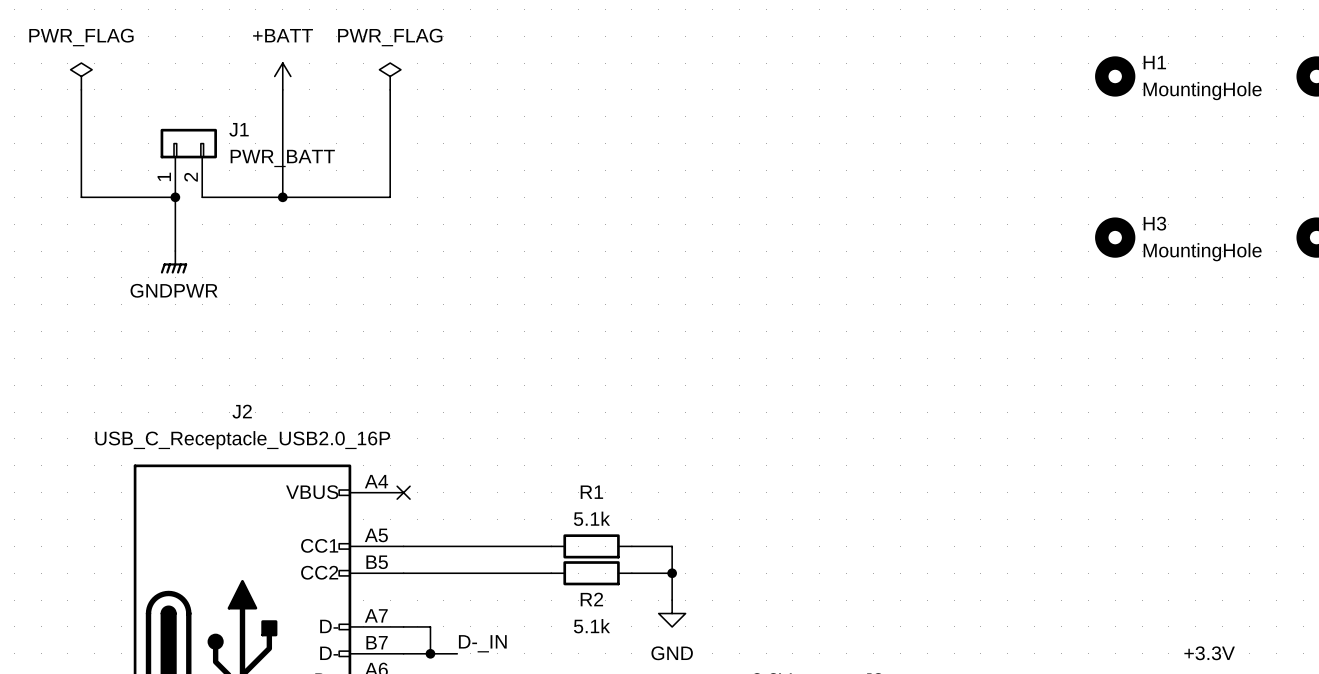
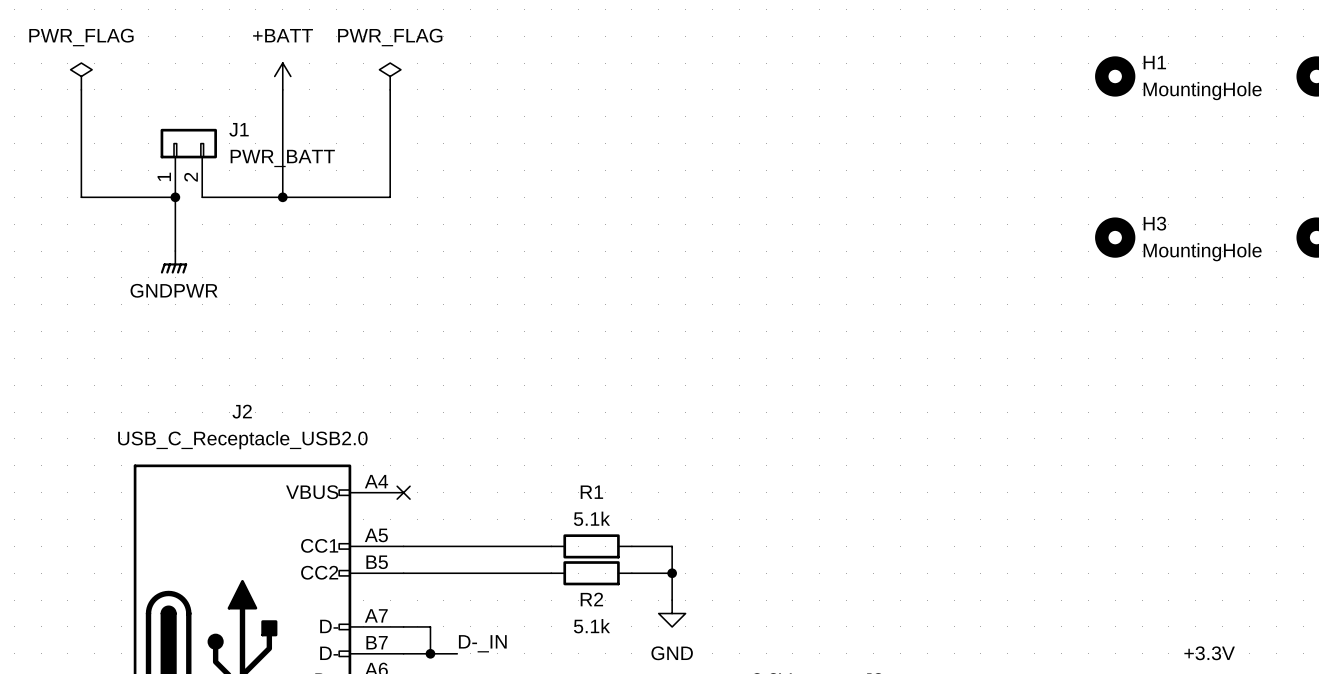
J2 value: USB_C_Receptacle_USB2.0_16P (242, 440) -> USB_C_Receptacle_USB2.0 (242, 440)

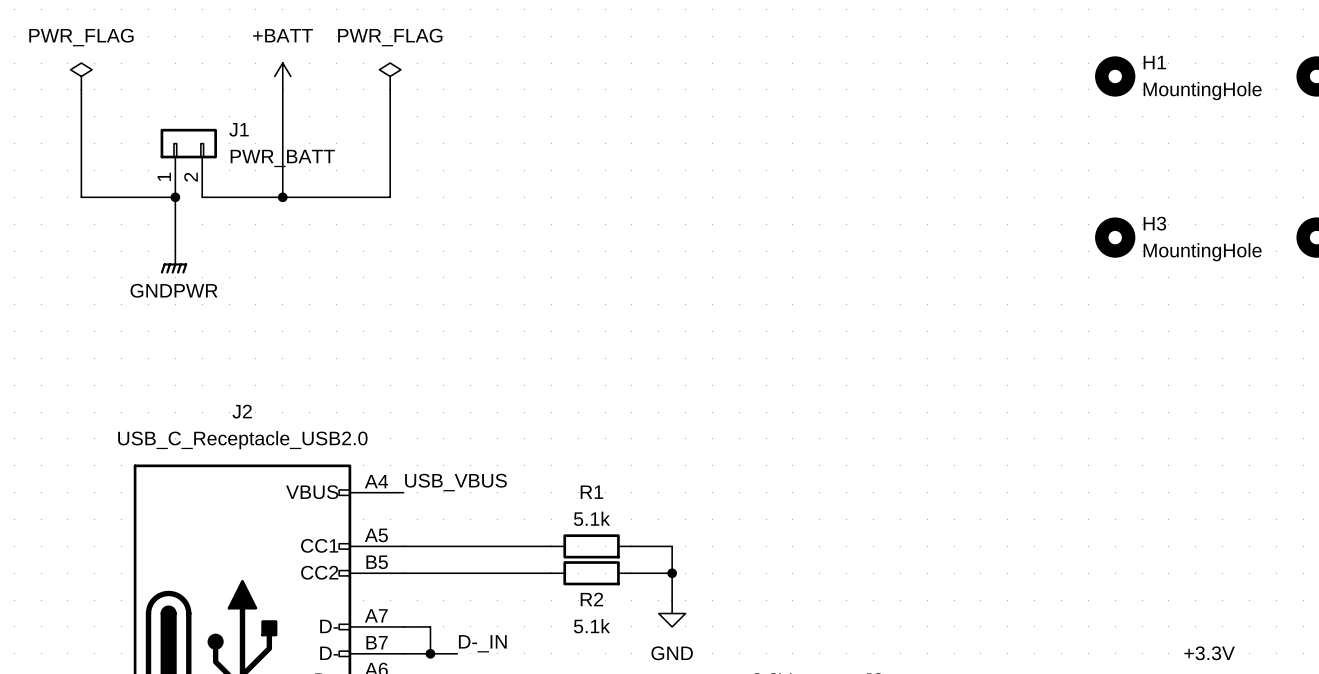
label: none -> USB_VBUS (455, 482)
no-connect mark: (403, 492) -> none

